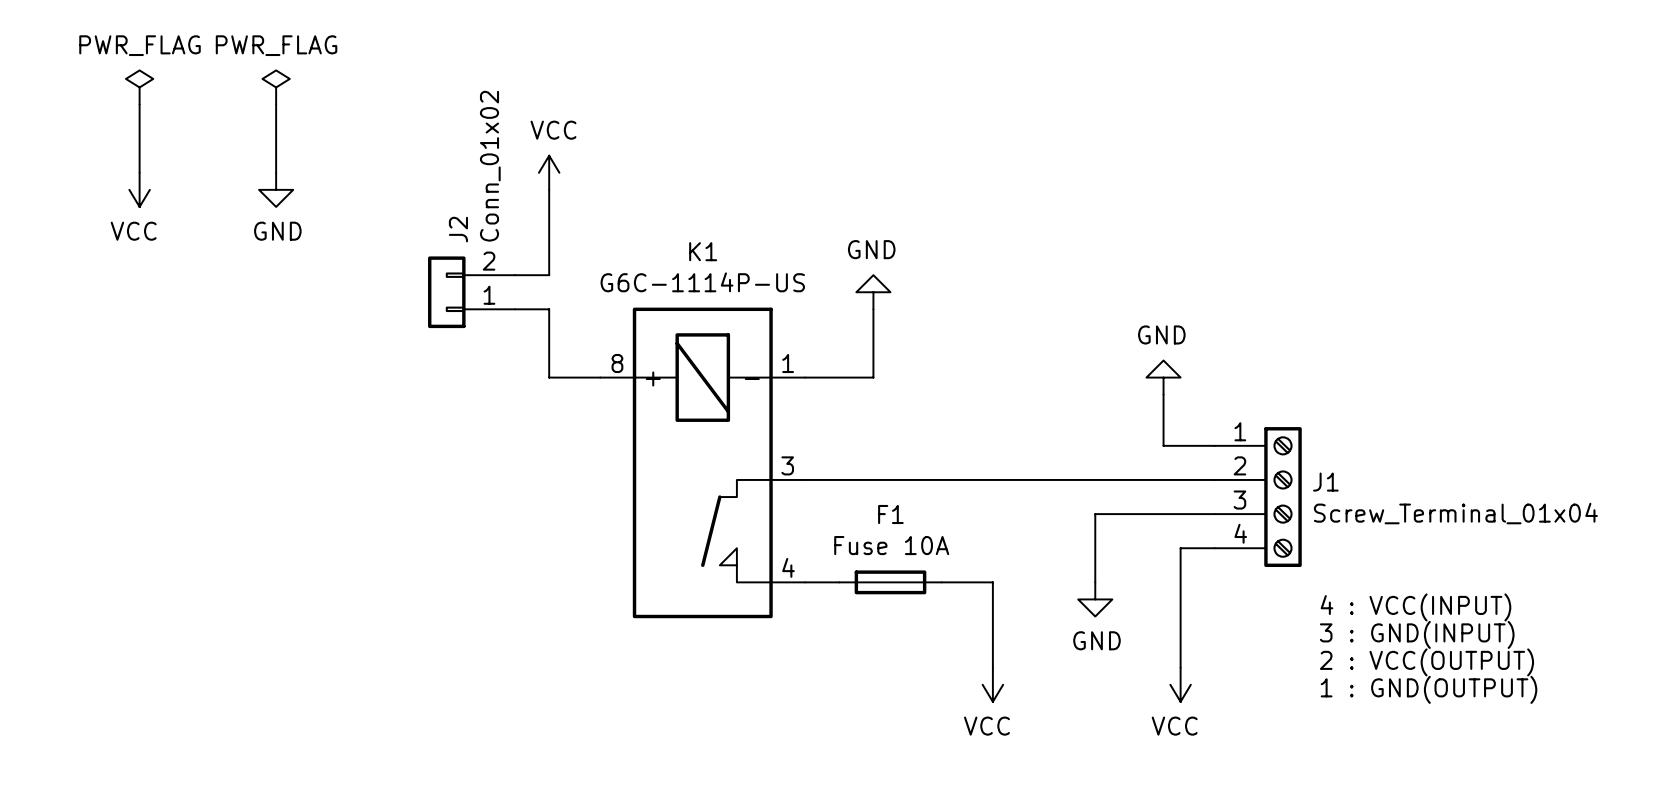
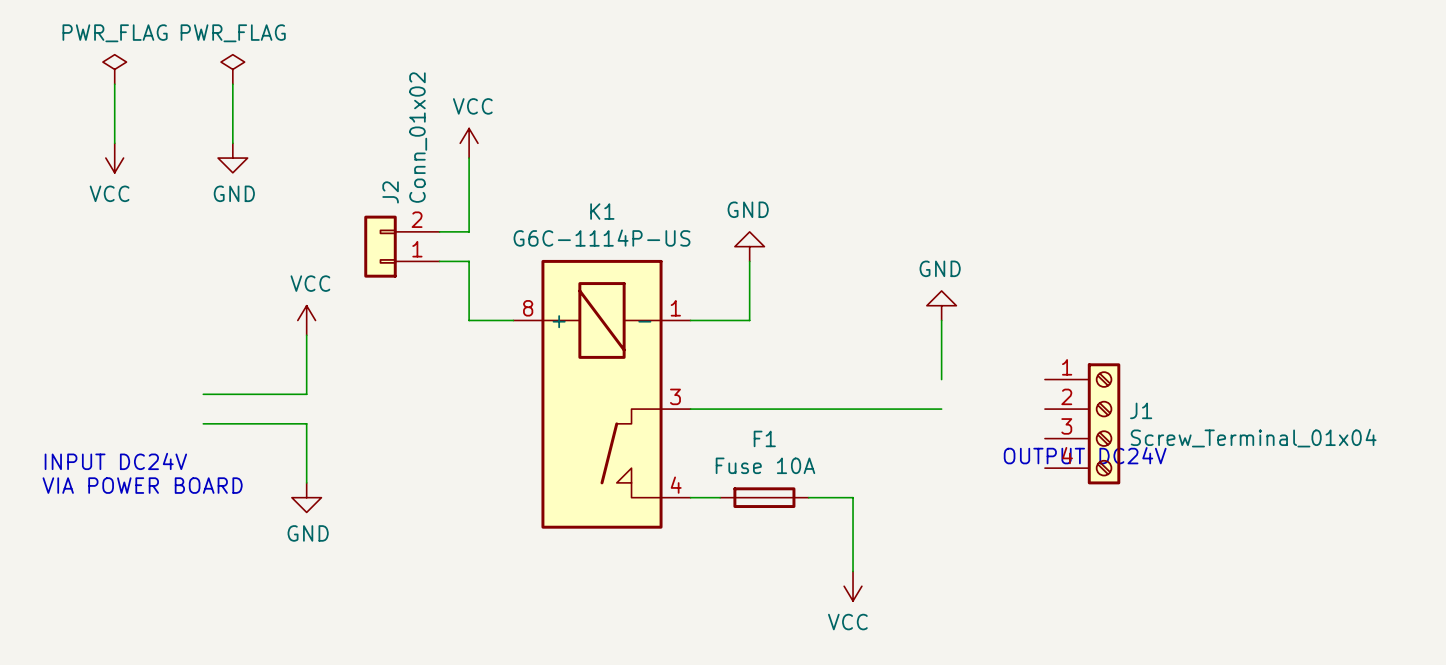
power symbol: none -> VCC (306, 320)
wire: none -> (941, 320) (941, 379)
power symbol position: GND (1163, 377) -> GND (941, 305)
wire: none -> (306, 335) (306, 394) (203, 394)
wire: (1163, 394) (1163, 445) (1214, 445) -> none
wire: (1095, 479) (1214, 479) -> none
wire: none -> (203, 423) (306, 423) (306, 482)
wire: (1214, 514) (1095, 514) (1095, 582) -> none
text: none -> OUTPUT DC24V (1085, 455)
text: none -> INPUT DC24V (115, 461)
wire: (1214, 548) (1180, 548) (1180, 667) -> none
text: none -> VIA POWER BOARD (142, 485)
power symbol: none -> GND (306, 497)
power symbol: GND (1095, 599) -> none
text: 4 : VCC(INPUT) (1415, 607) -> none
text: 3 : GND(INPUT) (1417, 634) -> none
text: 2 : VCC(OUTPUT) (1426, 662) -> none
power symbol: VCC (1180, 684) -> none
text: 1 : GND(OUTPUT) (1429, 689) -> none

